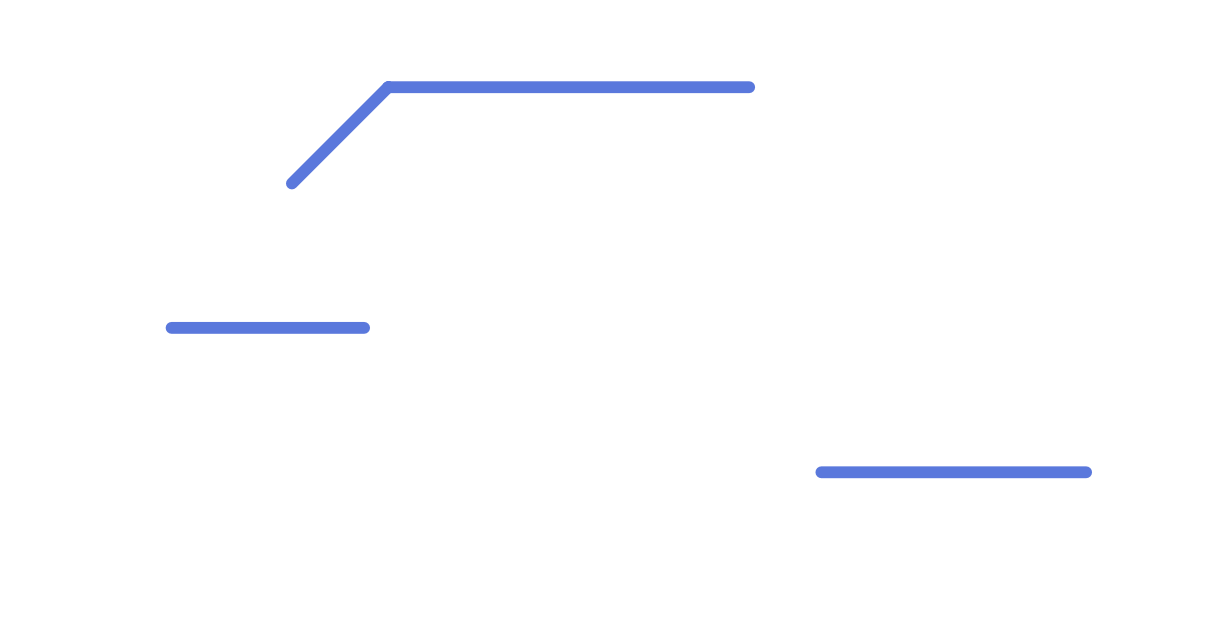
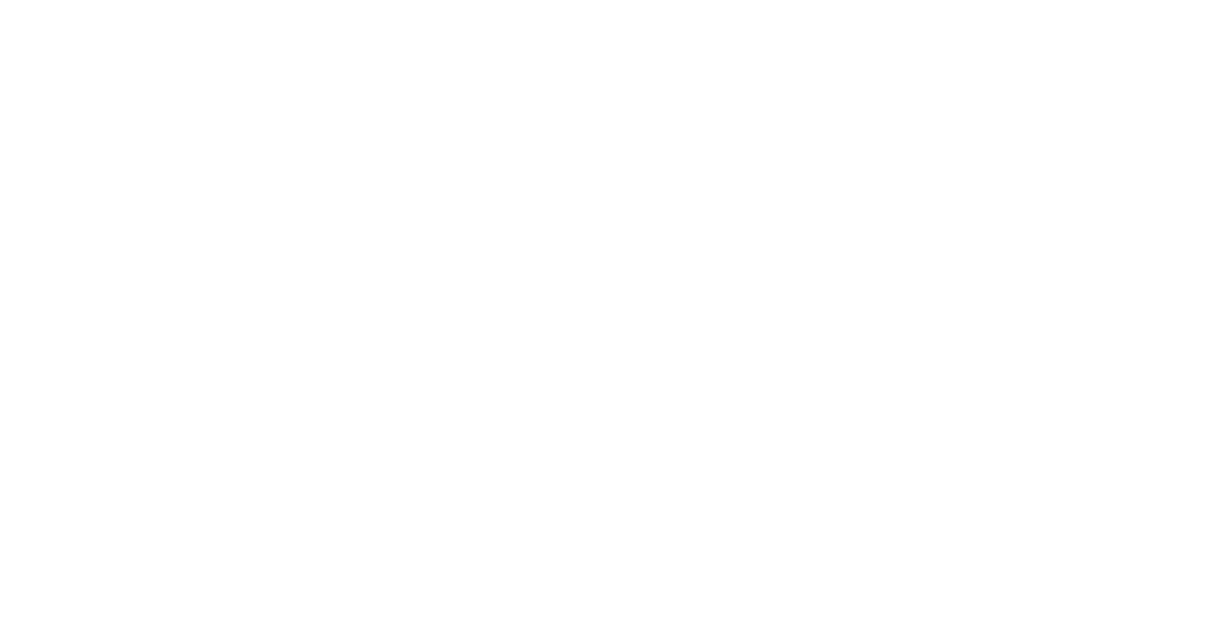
track: (749, 87) (388, 87) (291, 183) -> none
track: (364, 327) (171, 327) -> none
track: (1086, 472) (821, 472) -> none

